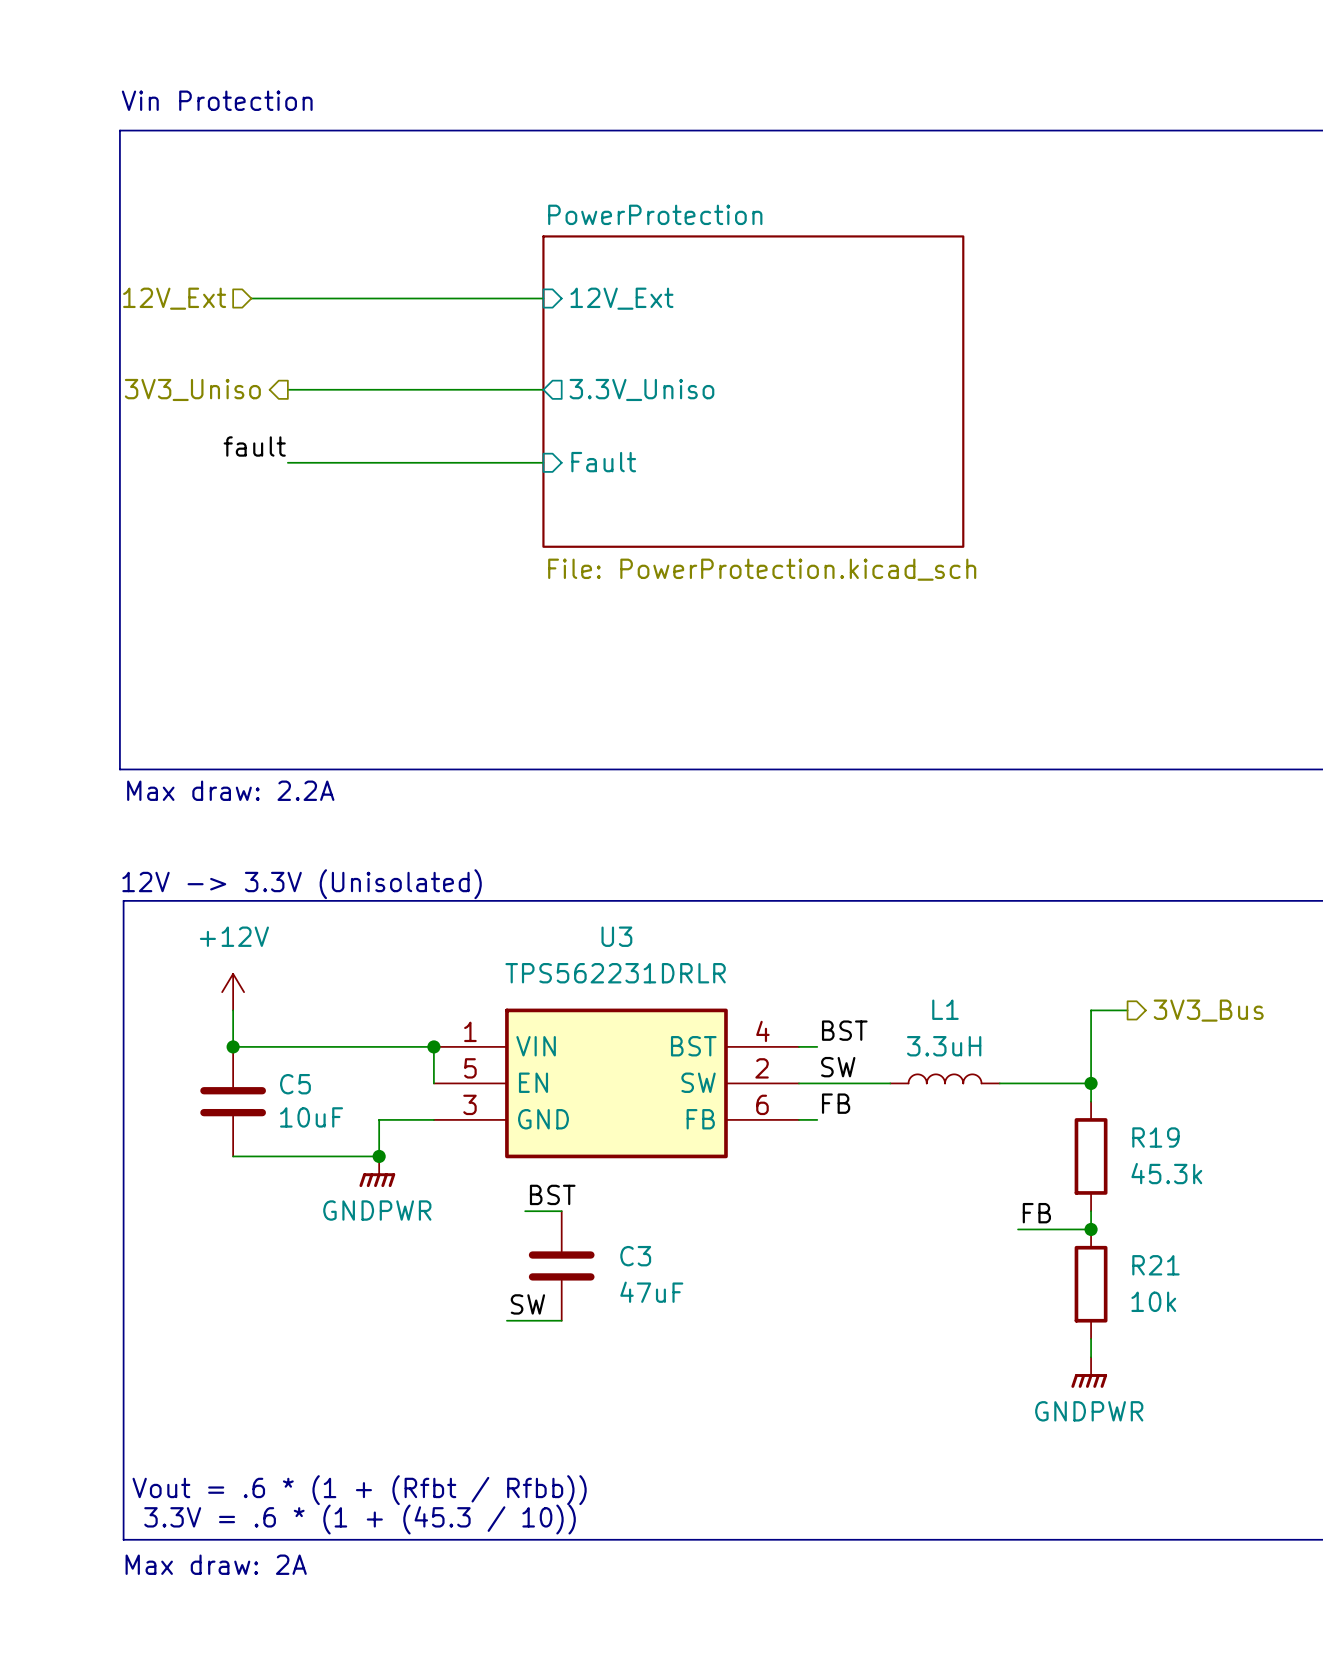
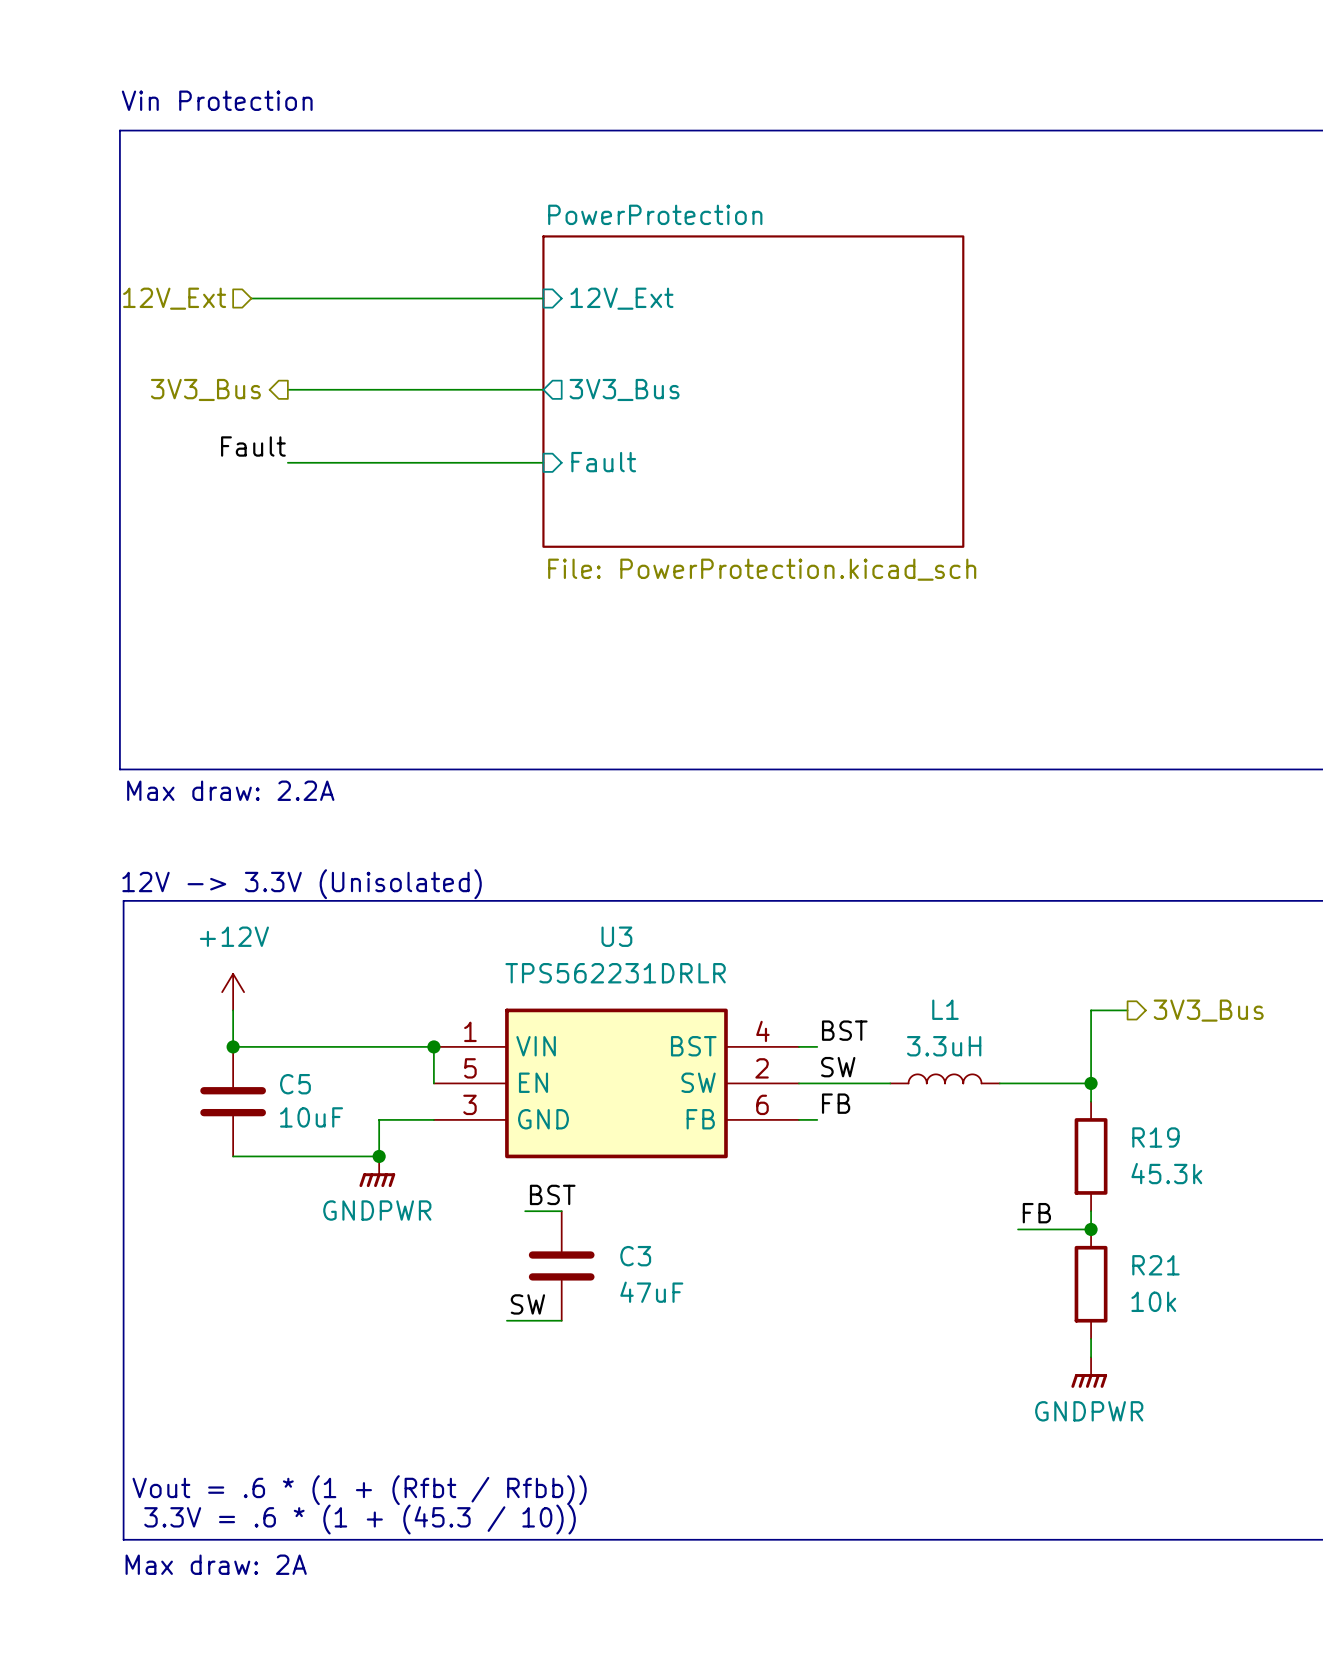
hierarchical label: 3V3_Uniso (192, 389) -> 3V3_Bus (205, 389)
sheet pin: 3.3V_Uniso (641, 389) -> 3V3_Bus (624, 389)
label: fault (254, 446) -> Fault (253, 446)

